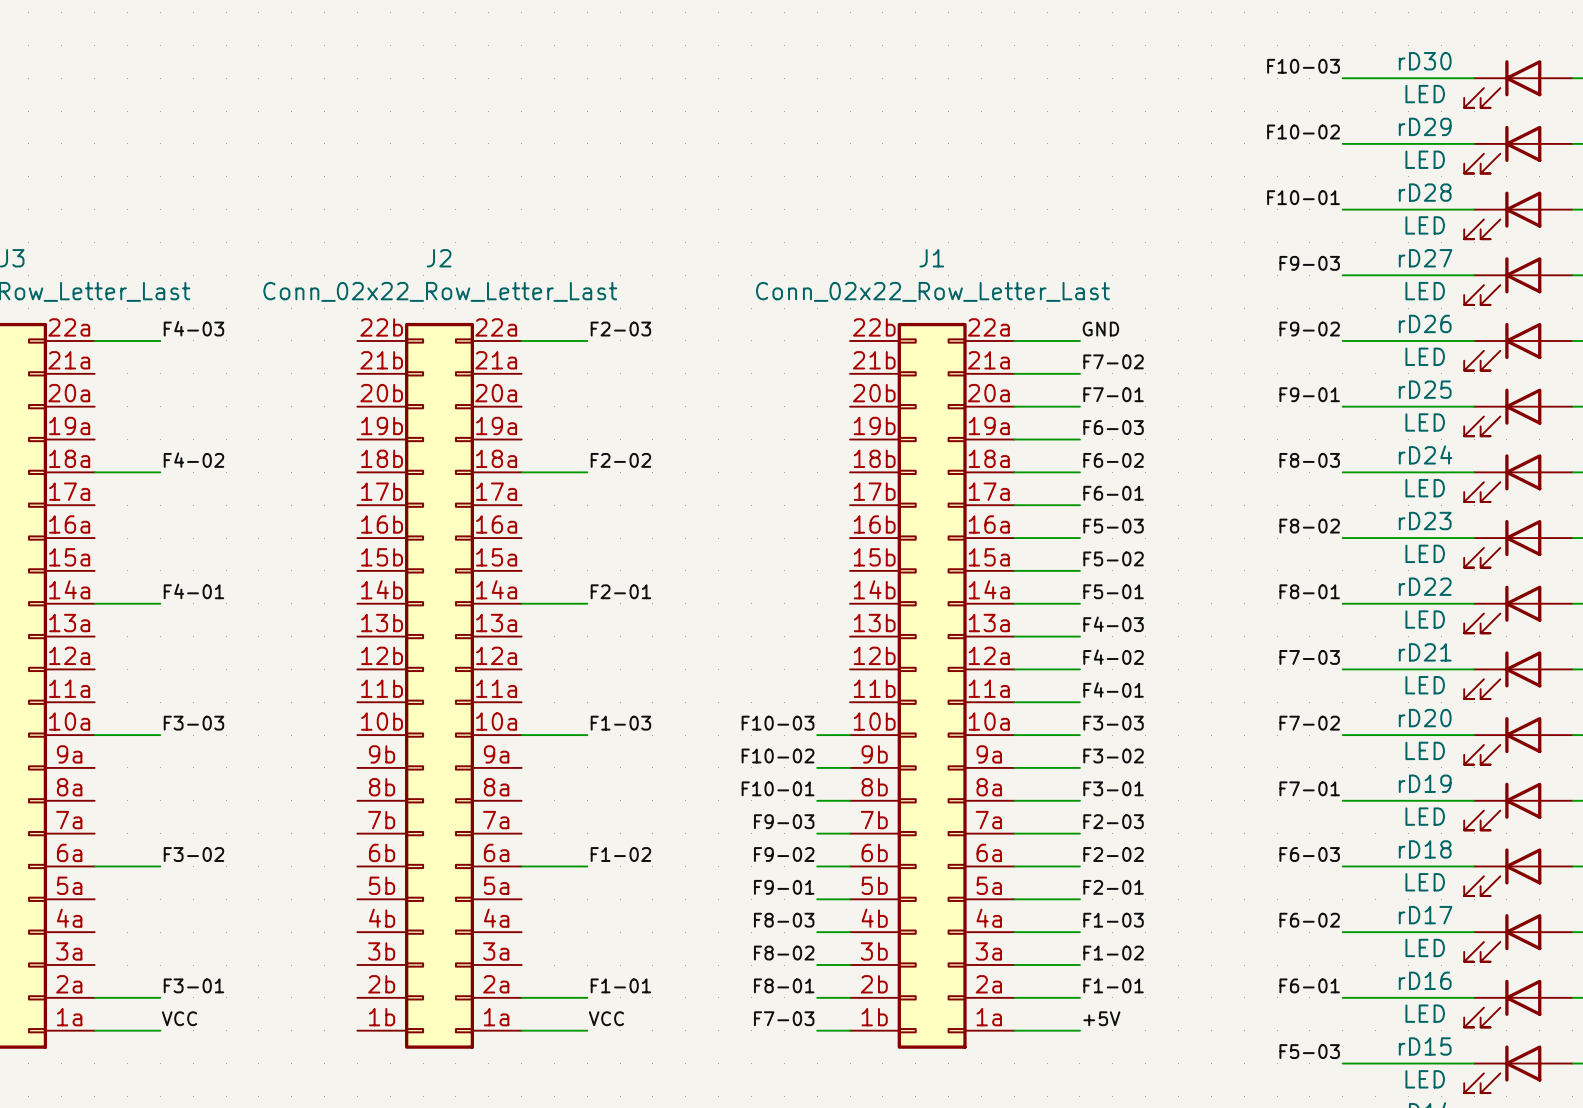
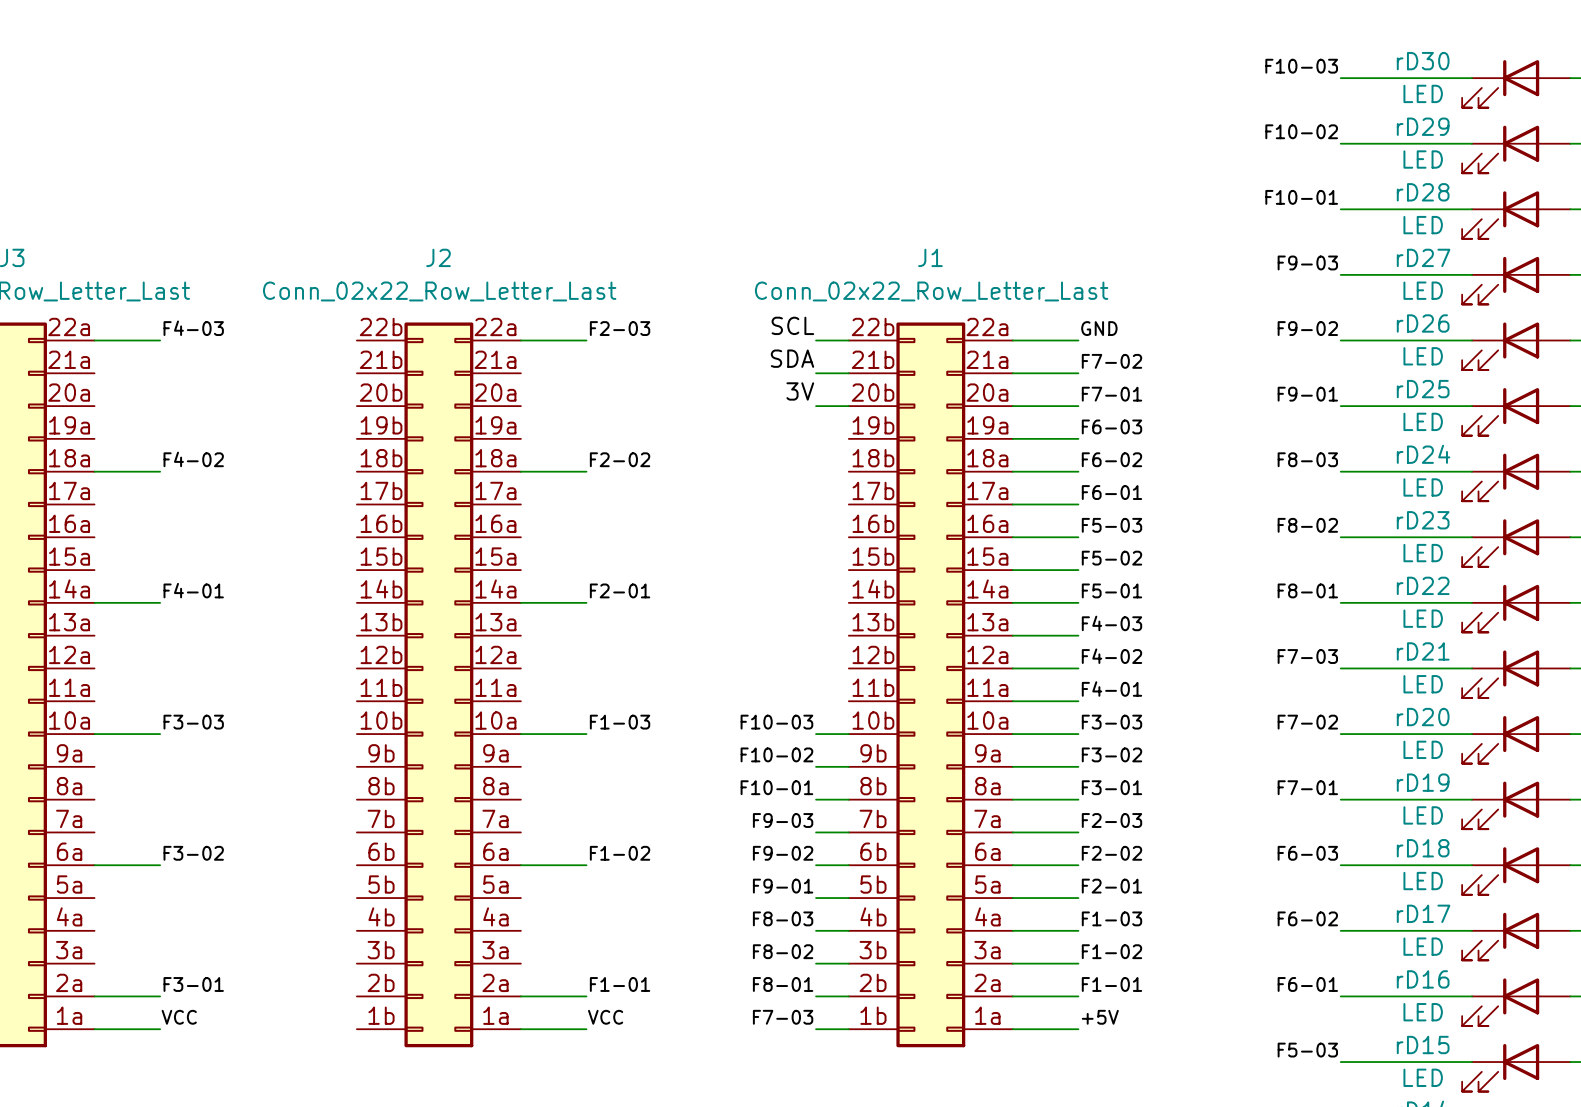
label: none -> SCL (792, 325)
wire: none -> (816, 340) (848, 340)
label: none -> SDA (792, 358)
wire: none -> (816, 373) (848, 373)
label: none -> 3V (800, 391)
wire: none -> (816, 406) (848, 406)

